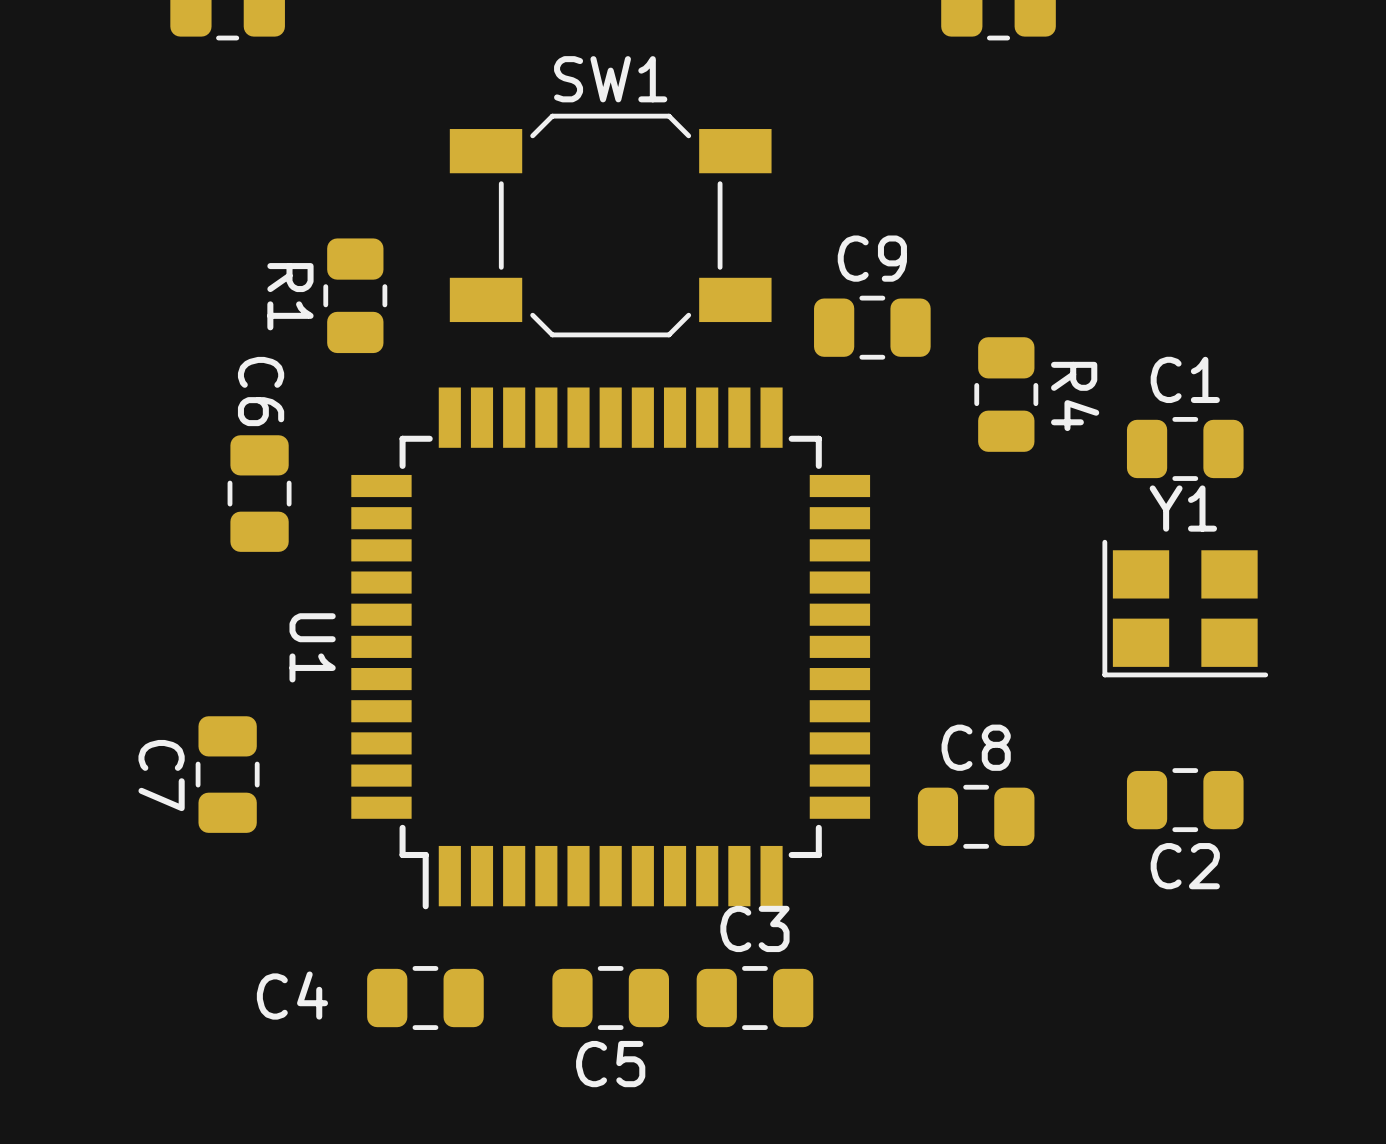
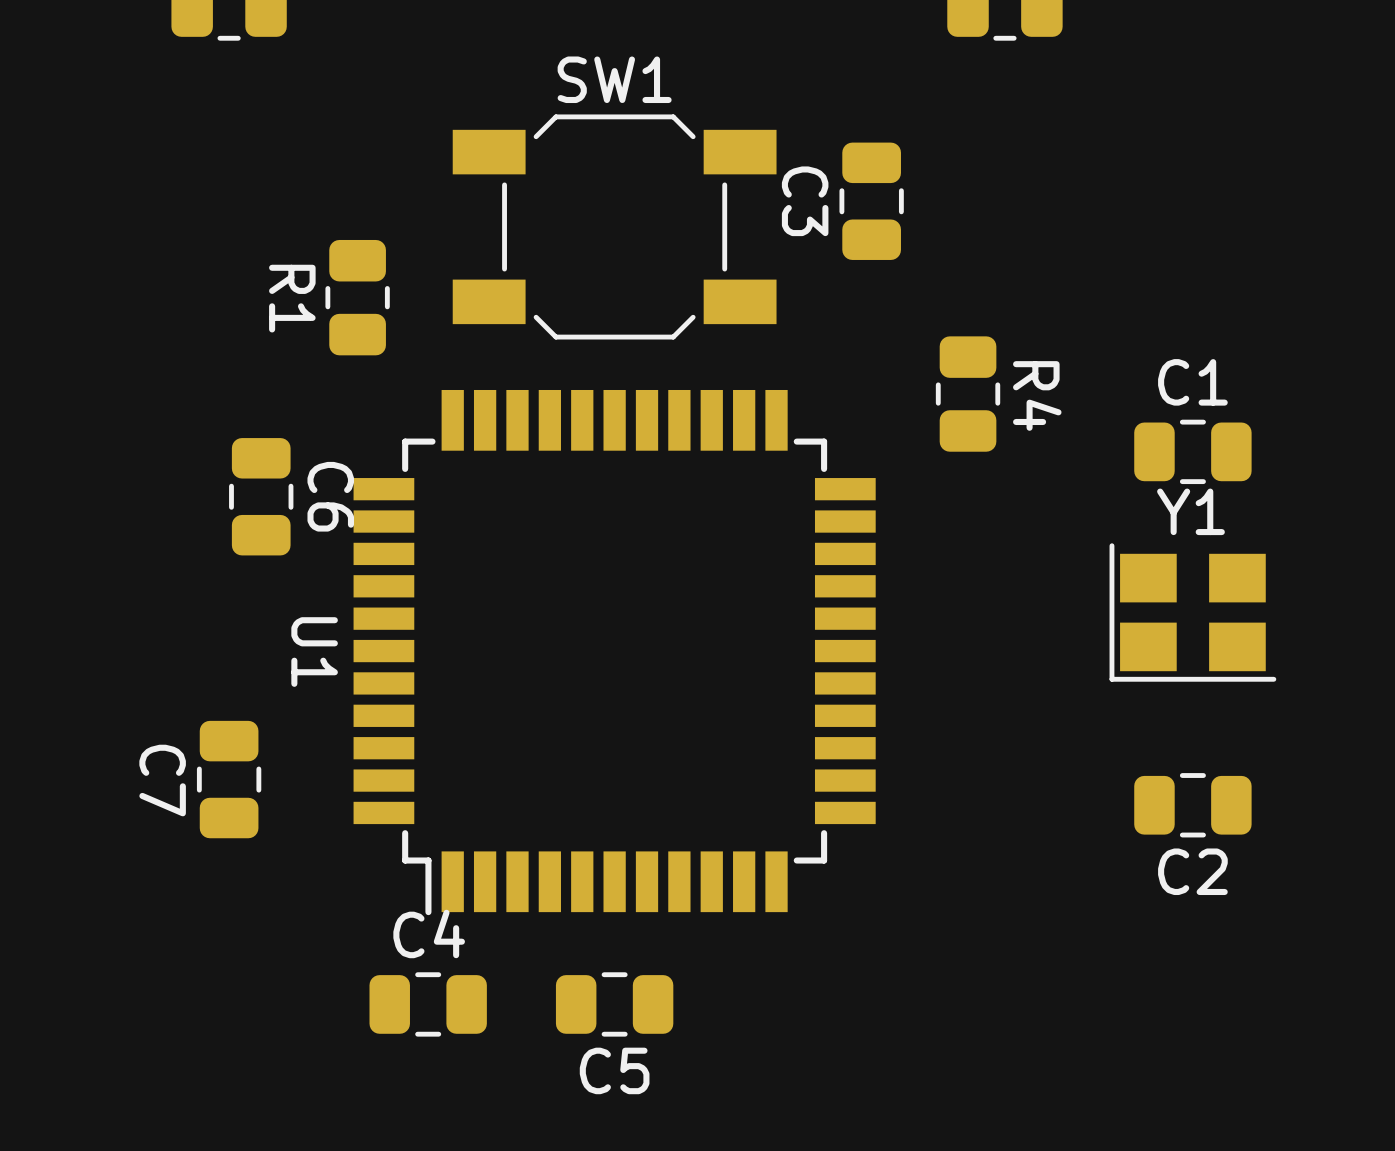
C9: (872, 327) -> none
C6 name position: C6 (261, 391) -> C6 (330, 496)
R4 position: (1006, 394) -> (968, 394)
C8: (976, 816) -> none
C3 name position: C3 (754, 928) -> C3 (805, 201)
C4 name position: C4 (292, 995) -> C4 (429, 933)
C3 rotation: 0° (754, 998) -> 90° clockwise (871, 201)
C3 position: (754, 998) -> (871, 201)

